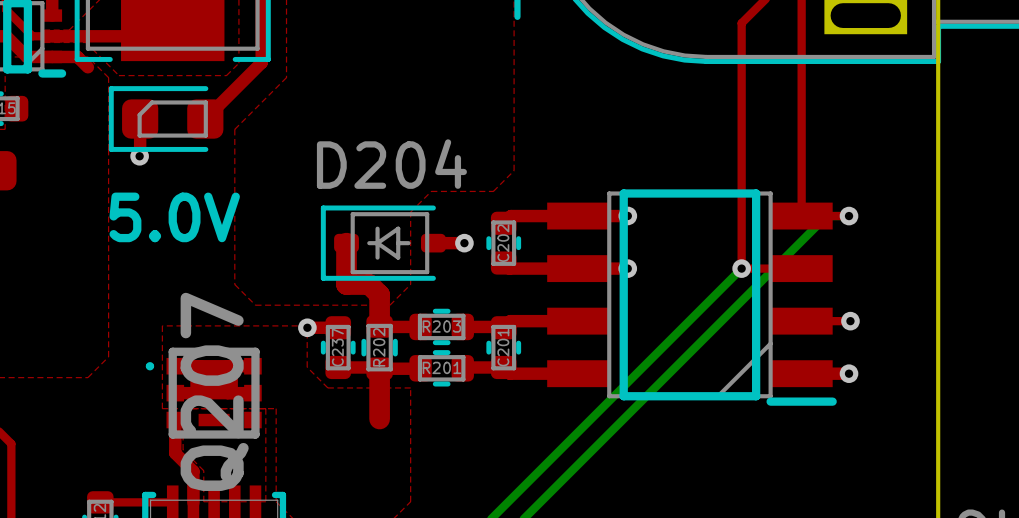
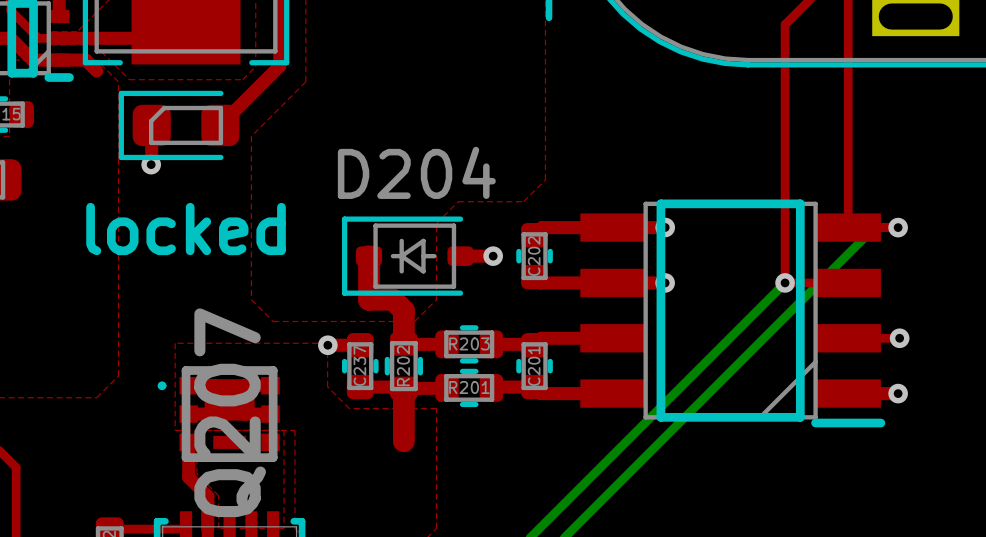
text: 5.0V (174, 217) -> locked (186, 229)

